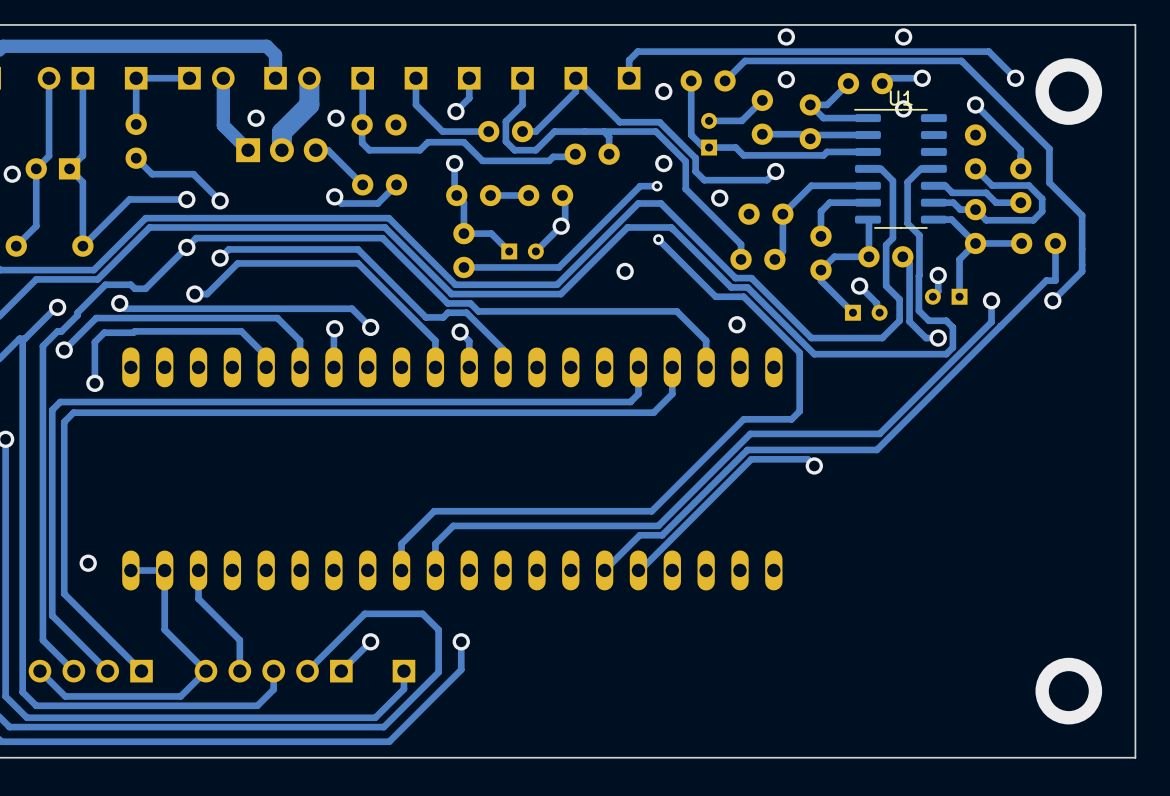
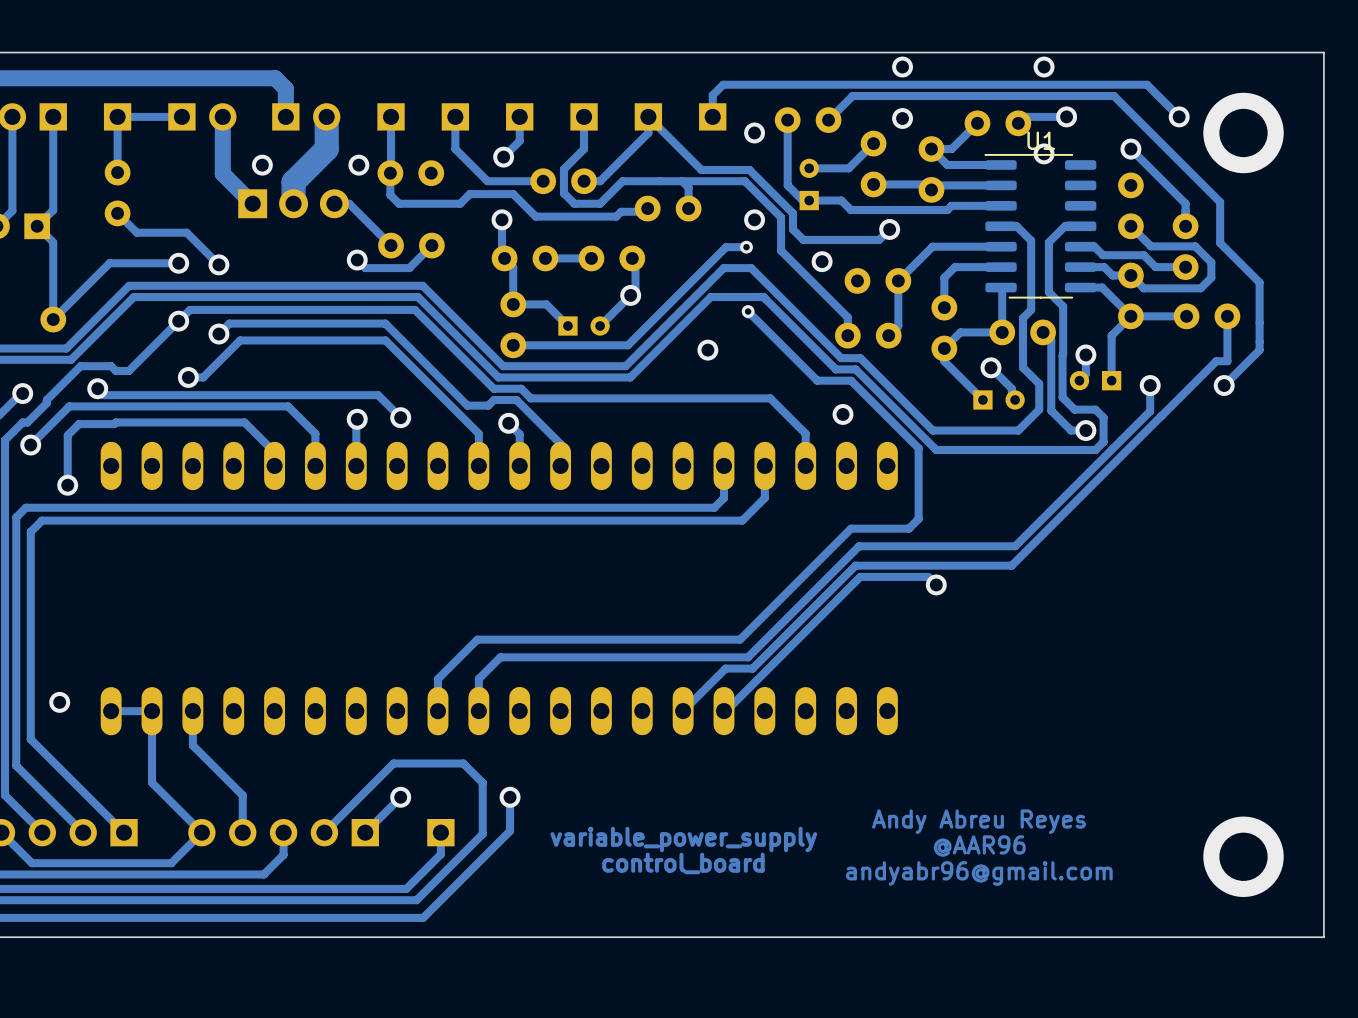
text: none -> Andy Abreu Reyes (978, 821)
text: none -> variable_power_supply (683, 839)
text: none -> @AAR96 (979, 846)
text: none -> control_board (683, 863)
text: none -> andyabr96@gmail.com (979, 873)

